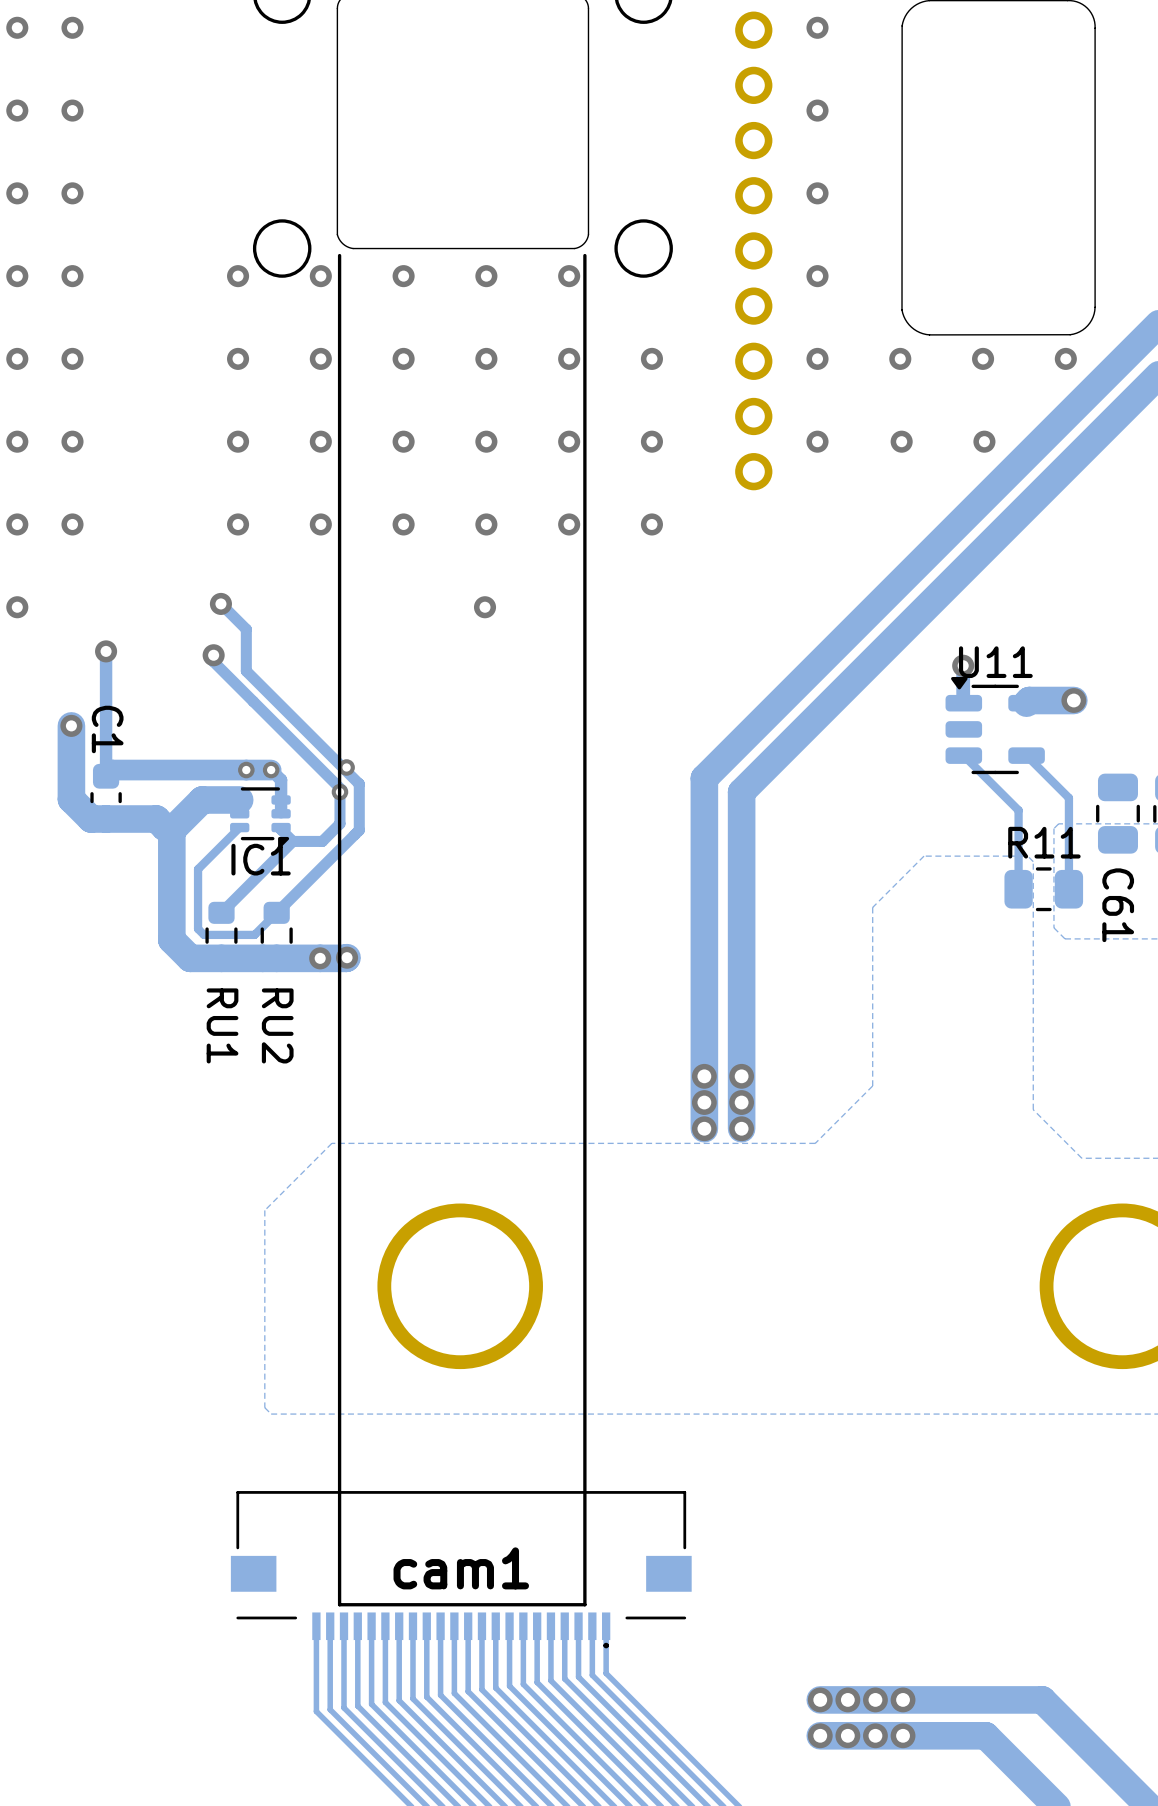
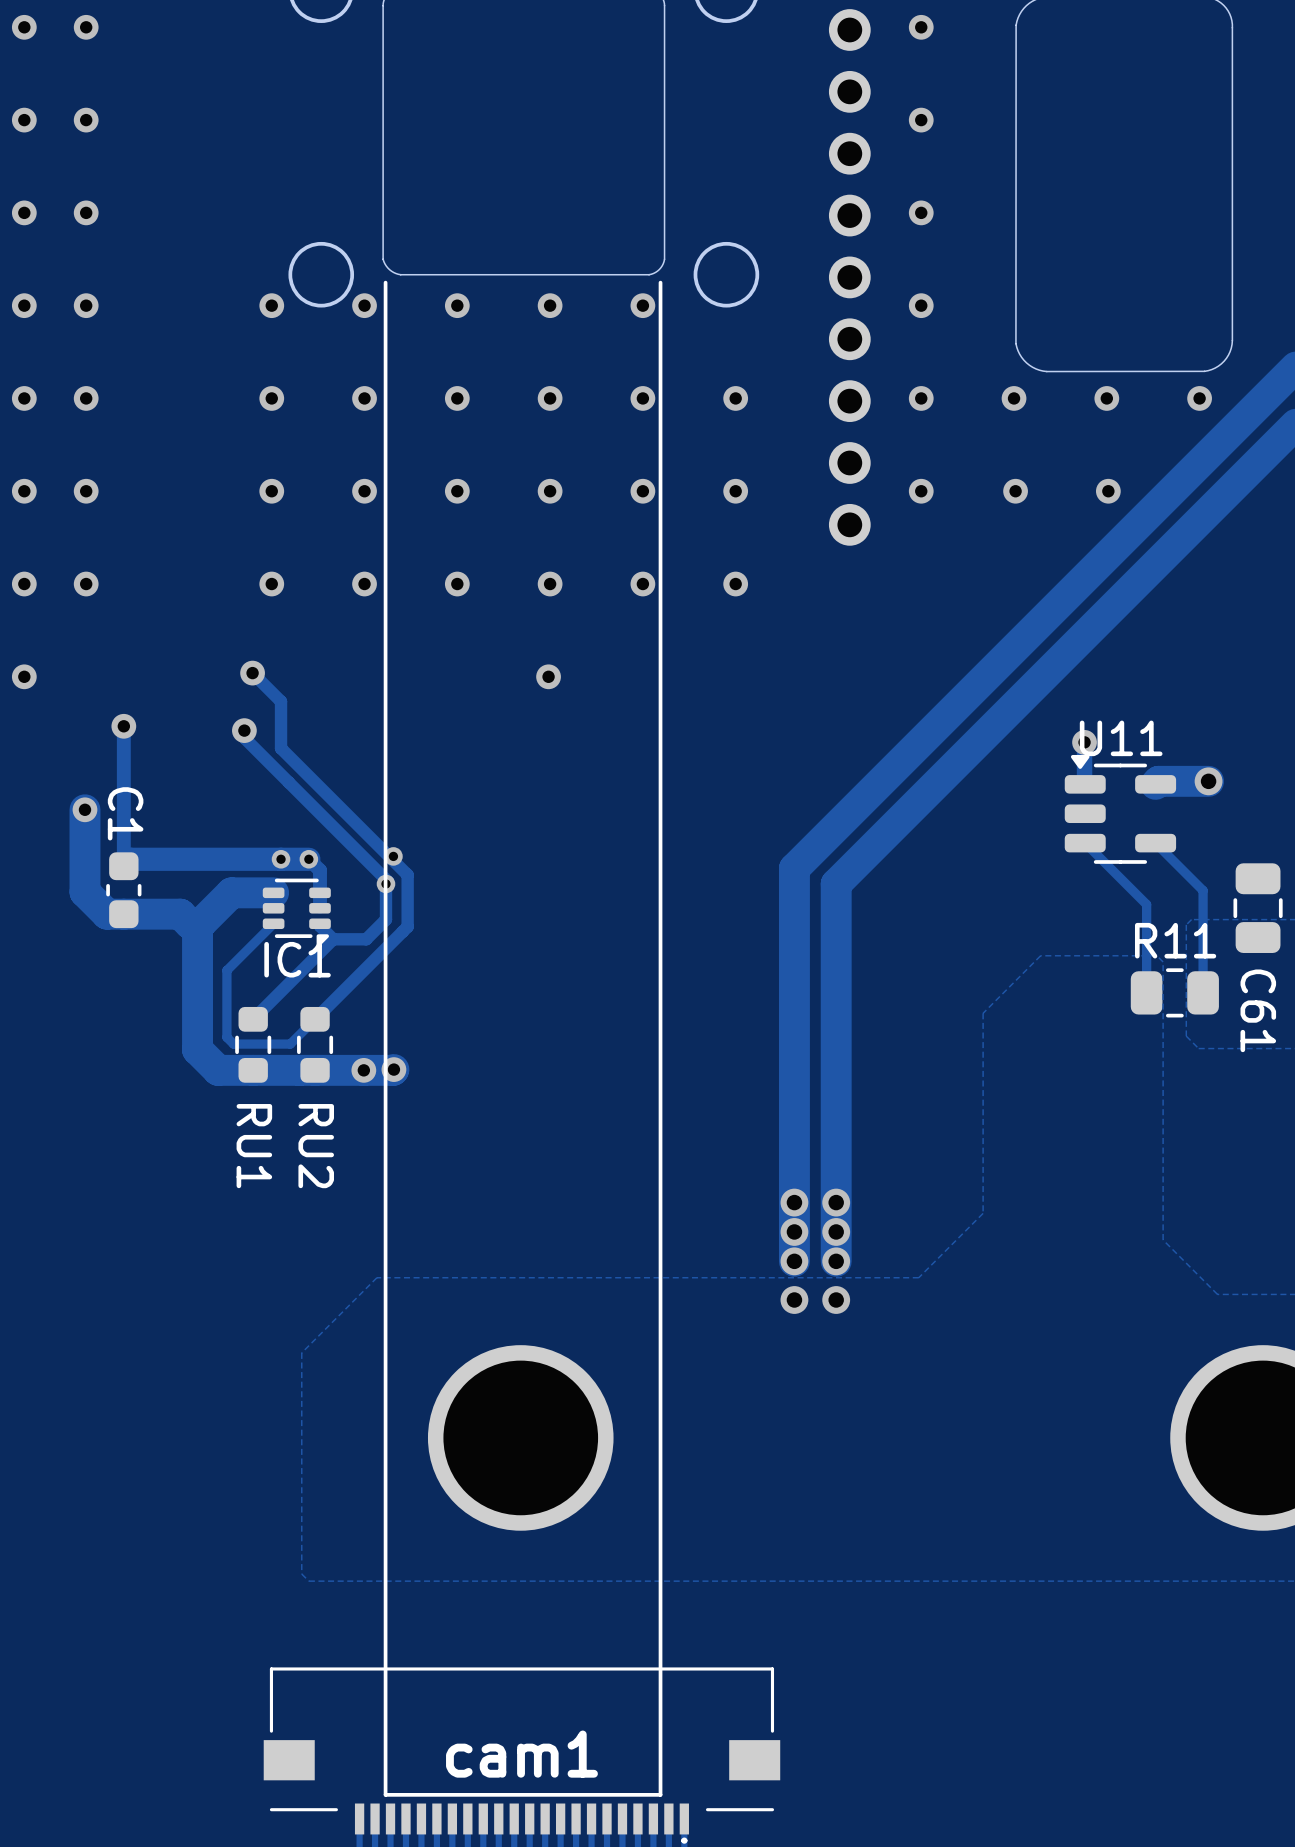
via: none -> (794, 1300)
via: none -> (836, 1300)

